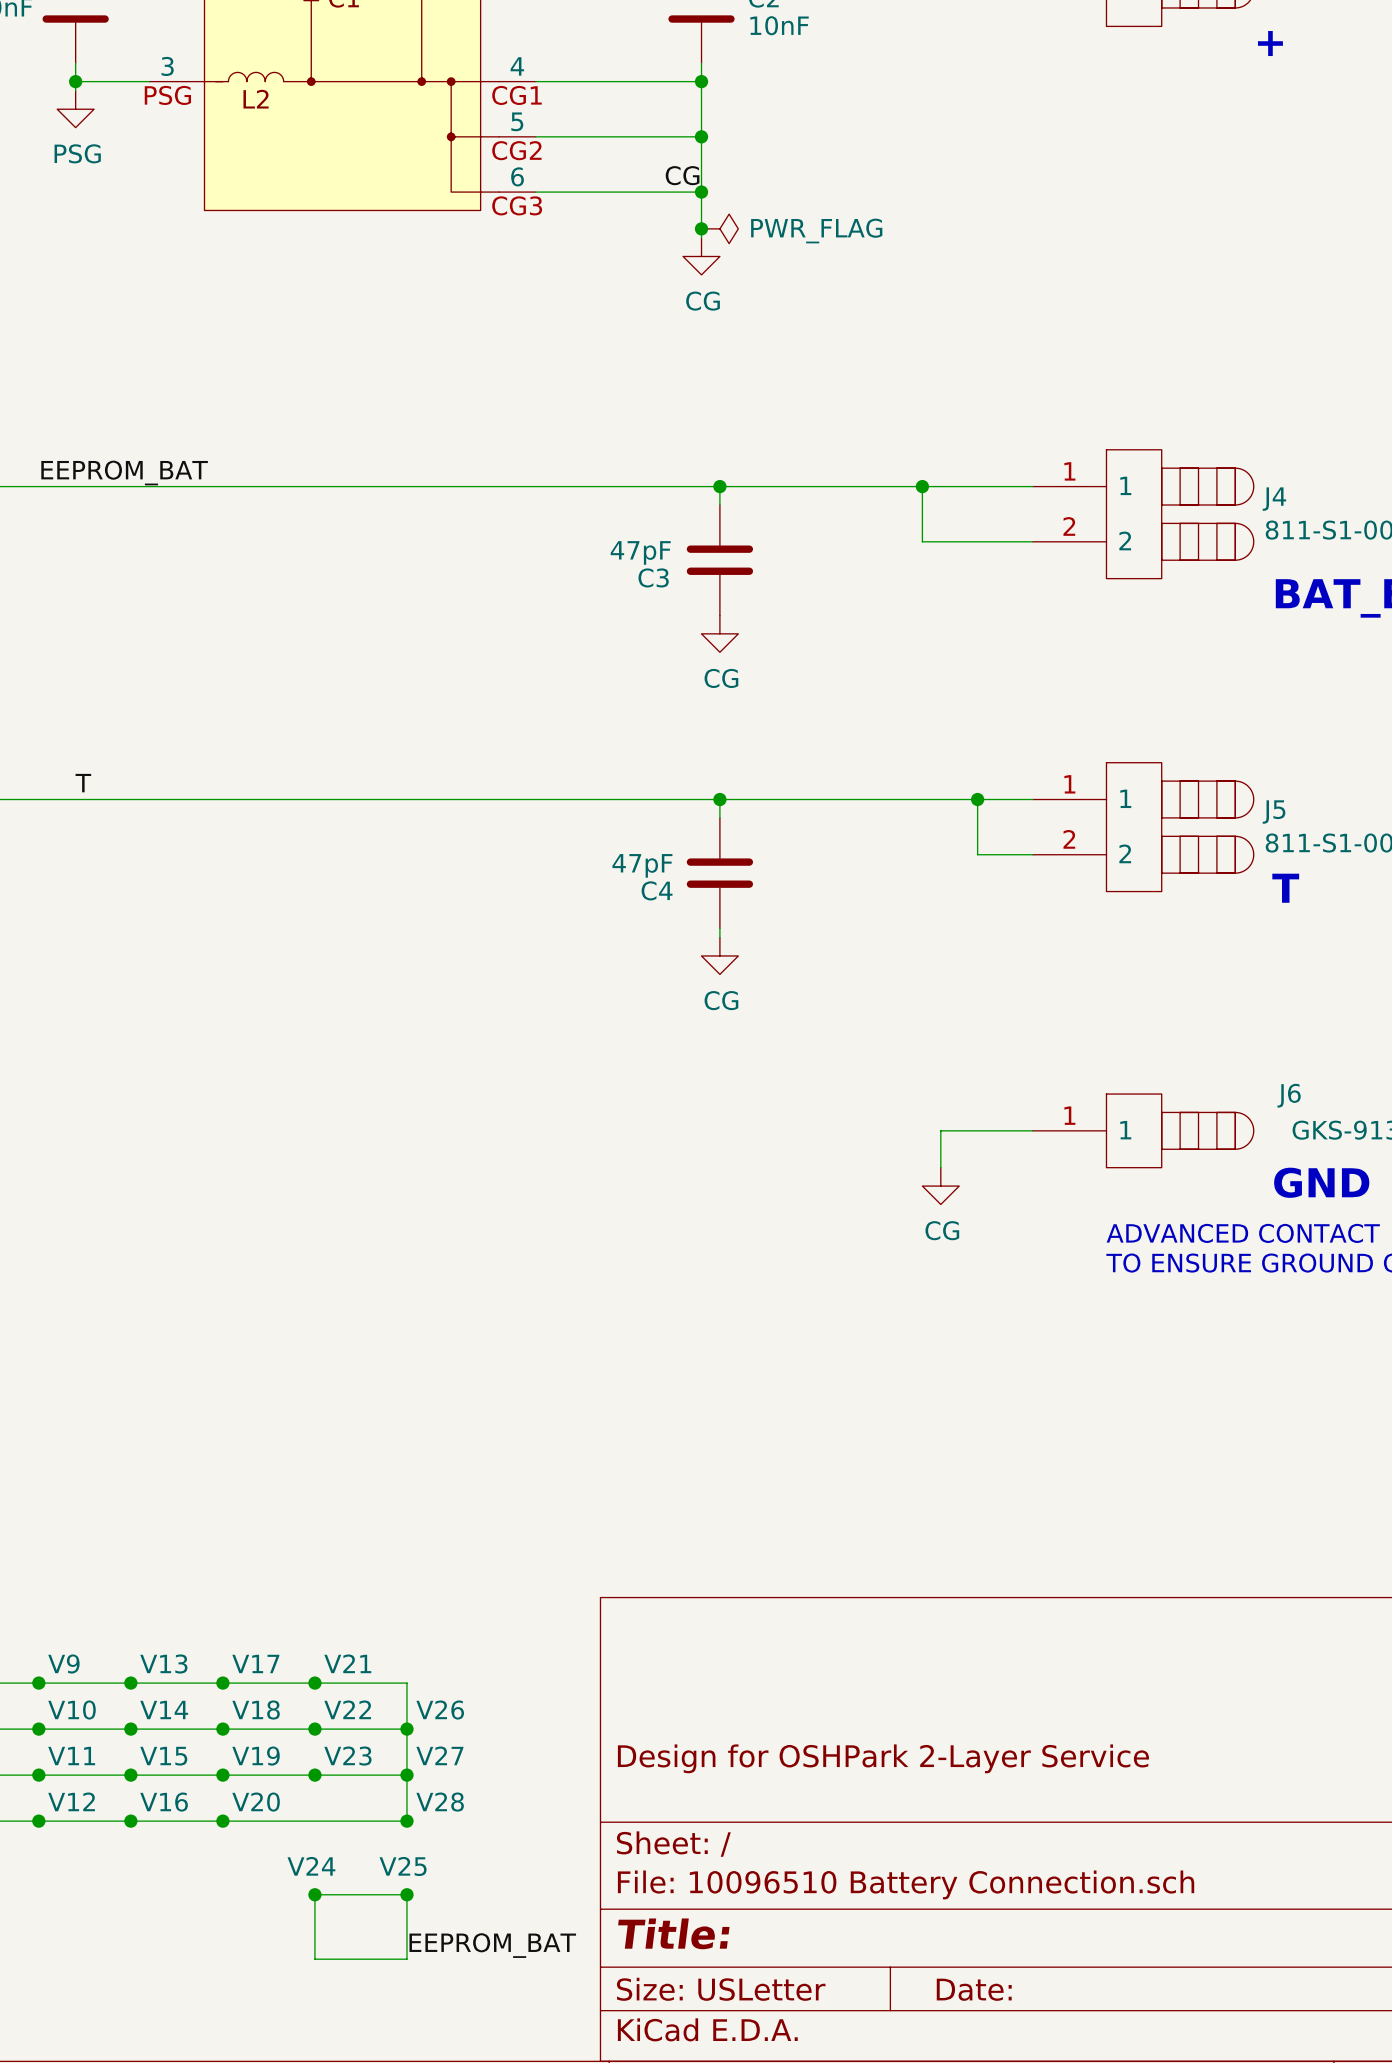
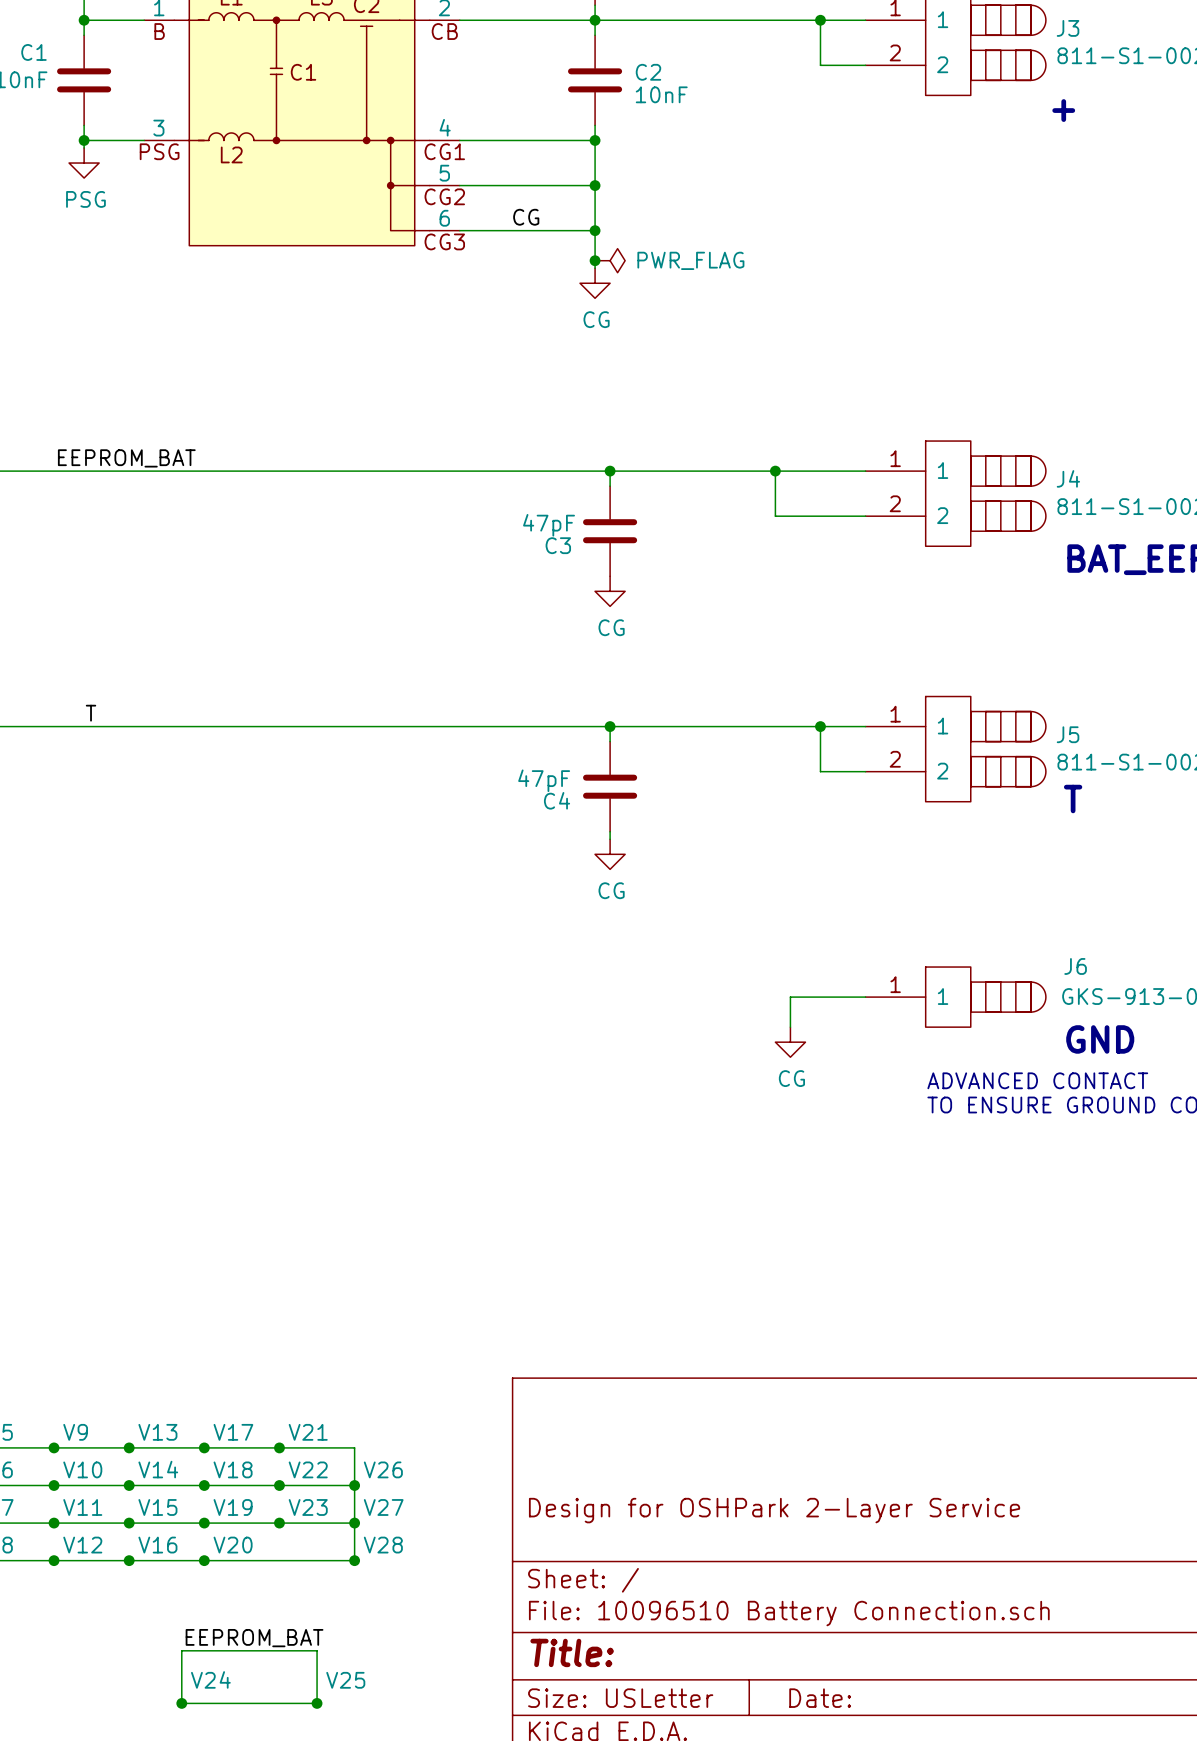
label position: CG (682, 175) -> CG (526, 217)
V24 position: (311, 1866) -> (210, 1679)
V25 position: (403, 1866) -> (345, 1680)
wire: (314, 1894) (314, 1959) (406, 1959) (406, 1894) (314, 1894) -> none
junction: (314, 1894) -> none
junction: (406, 1894) -> none
wire: none -> (181, 1650) (181, 1703) (317, 1703) (317, 1650) (181, 1650)
label position: EEPROM_BAT (492, 1945) -> EEPROM_BAT (254, 1638)
junction: none -> (181, 1703)
junction: none -> (317, 1703)

